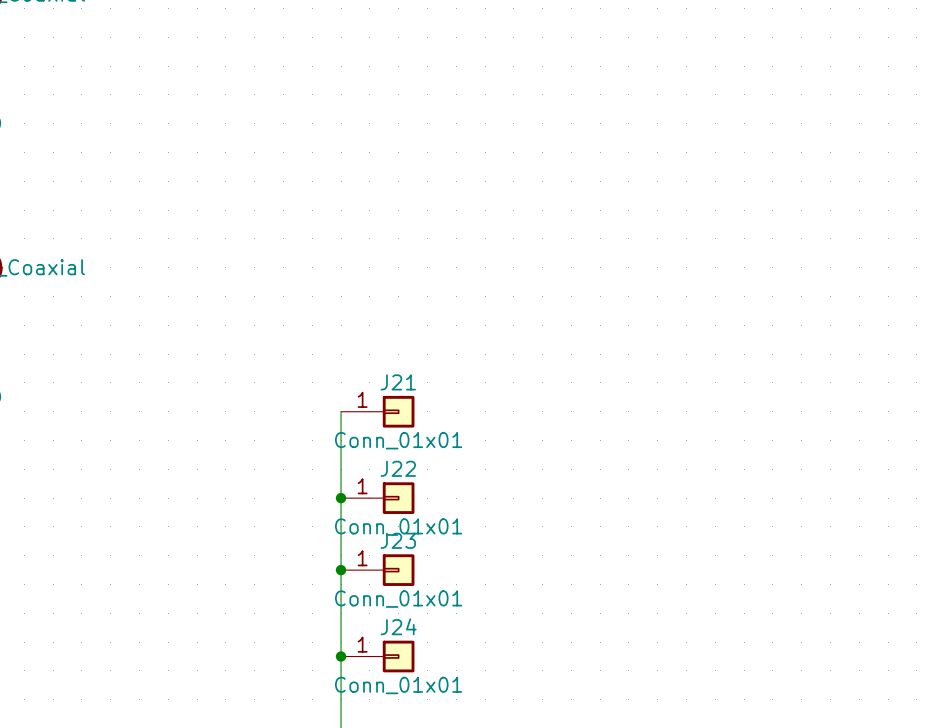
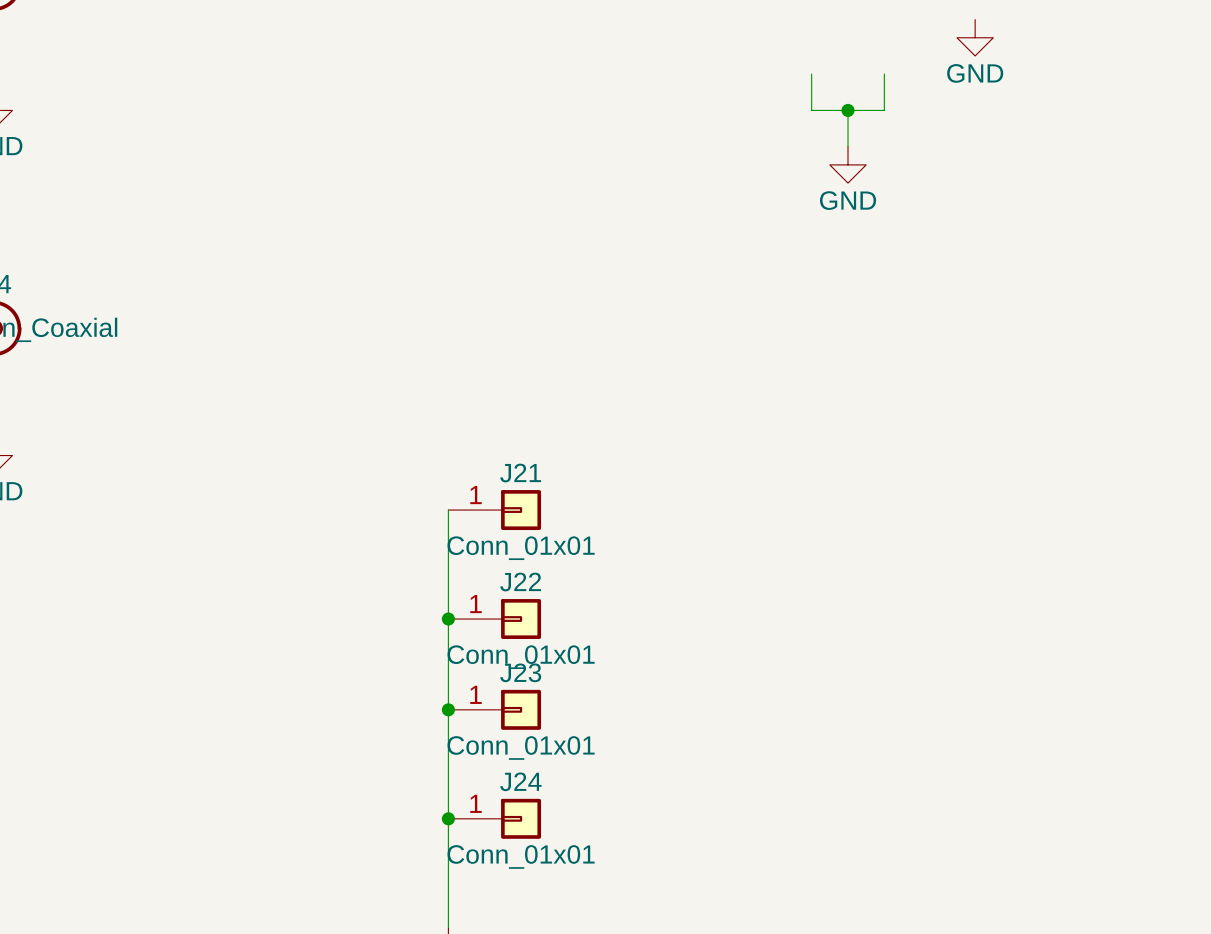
power symbol: none -> GND (975, 37)
wire: none -> (811, 74) (811, 110) (884, 110) (884, 74)
wire: none -> (848, 110) (848, 146)
junction: none -> (848, 110)
power symbol: none -> GND (848, 164)

